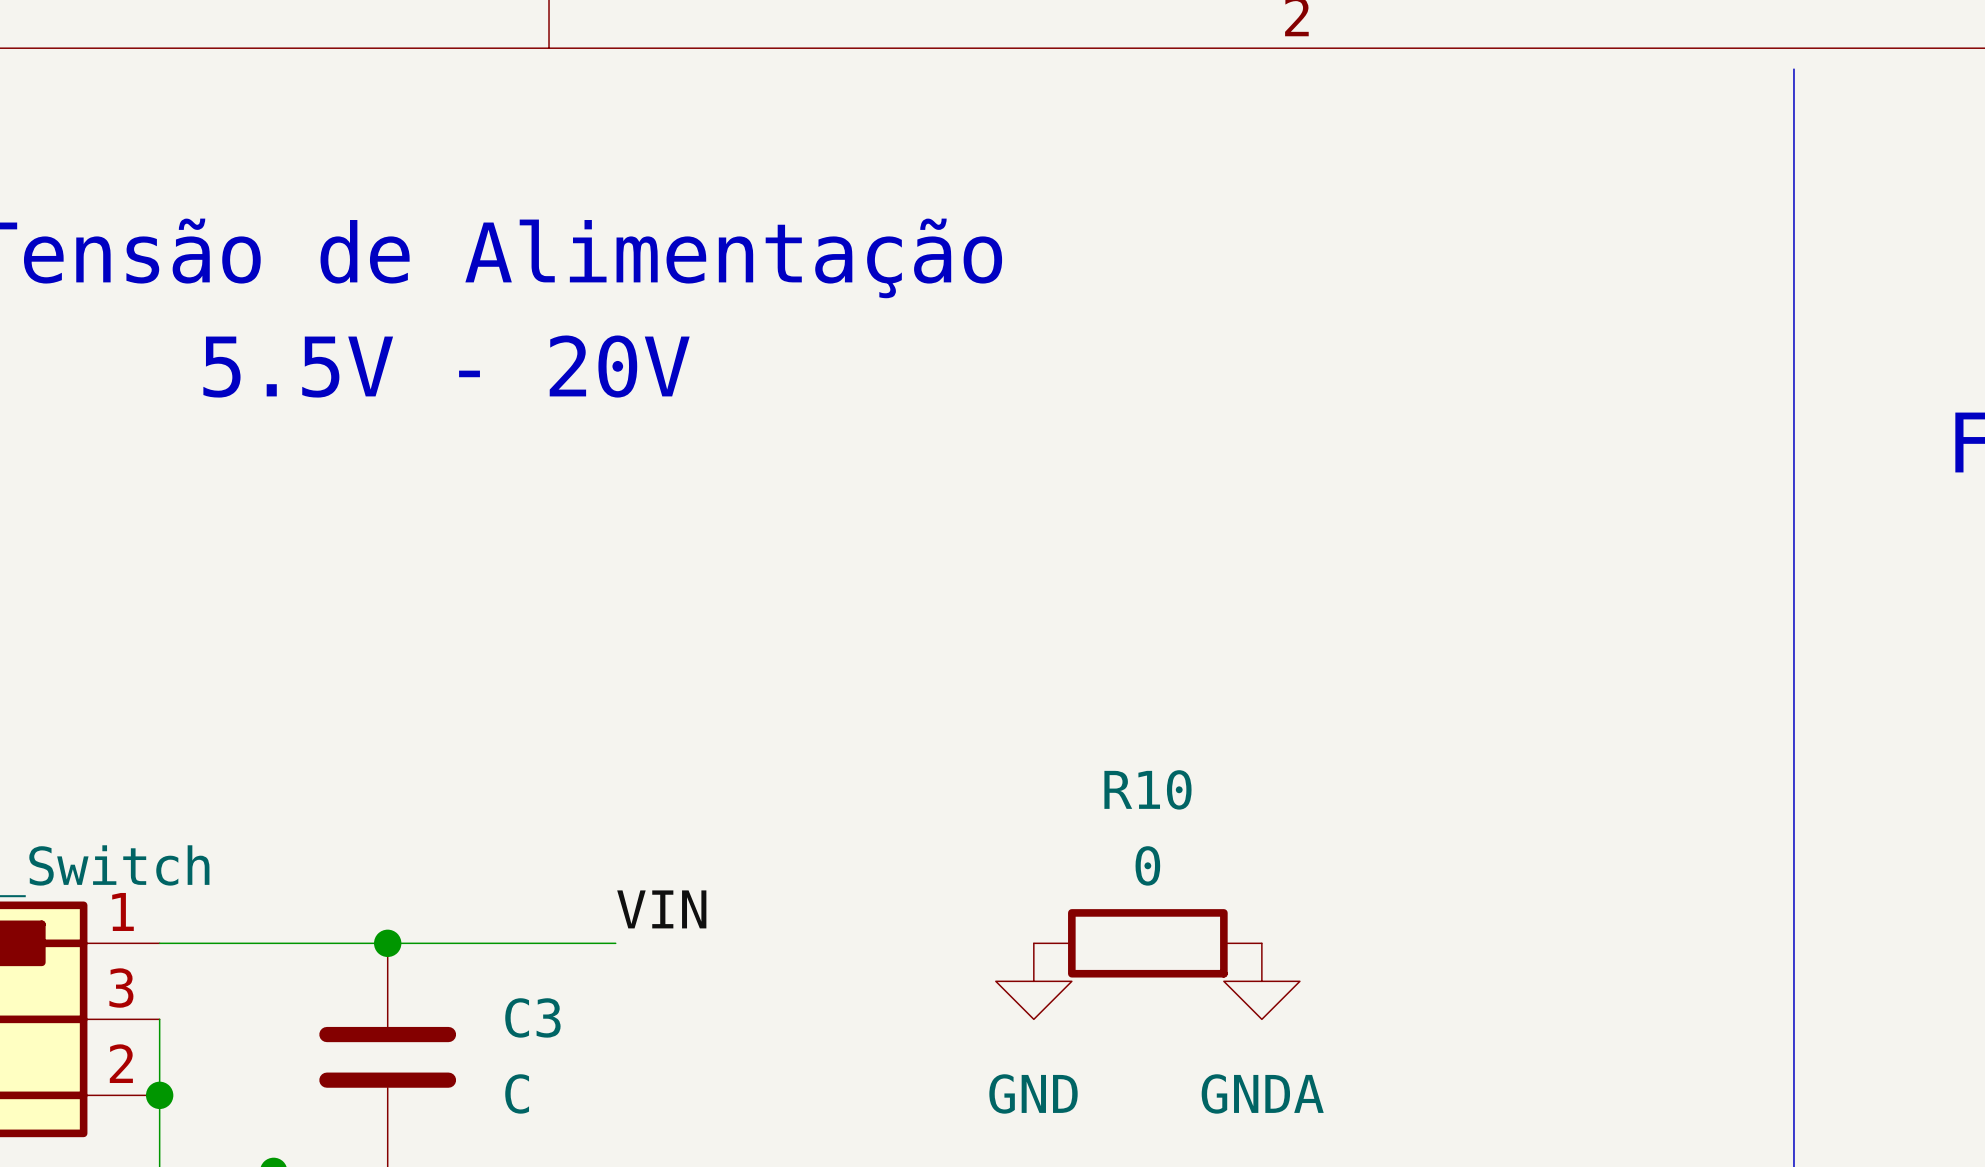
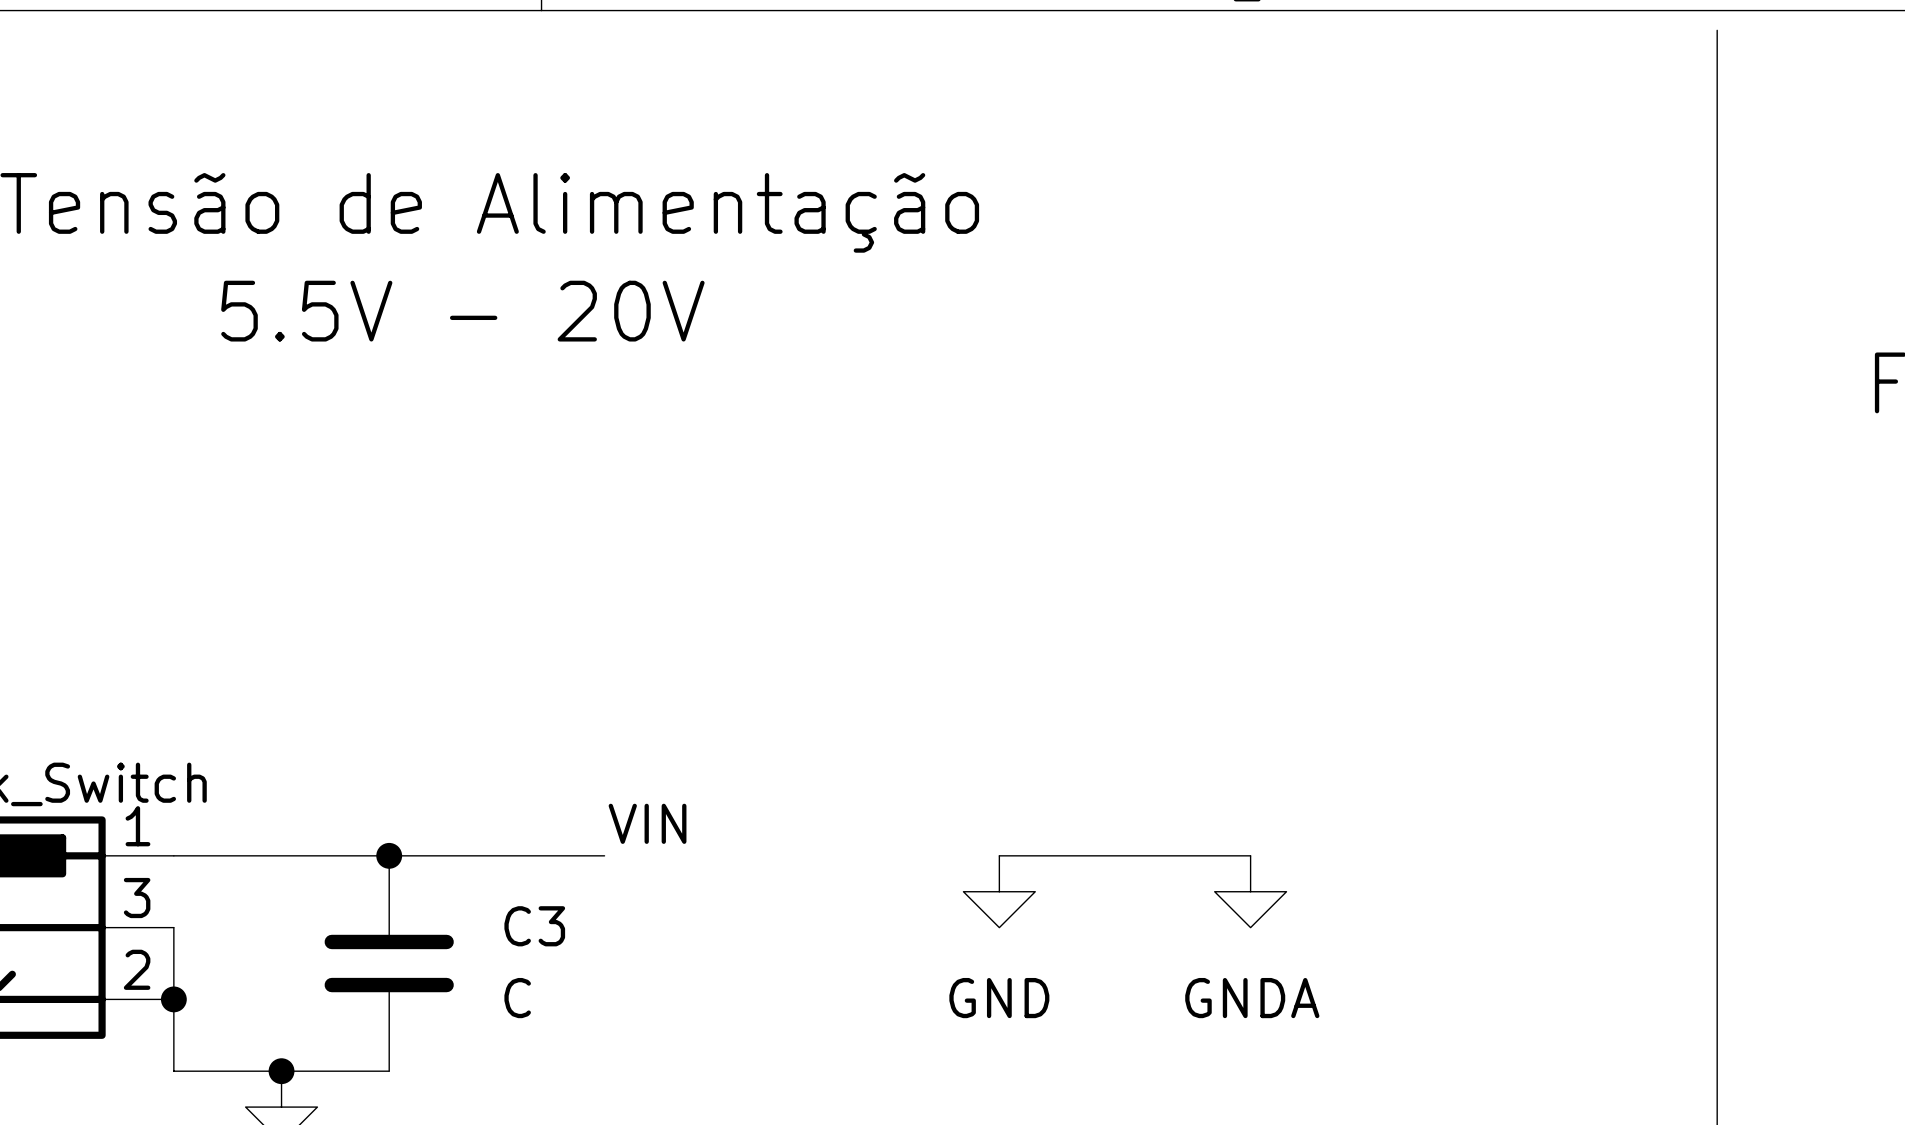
wire: none -> (999, 855) (1250, 855)
R10: 0 (1147, 943) -> none
power symbol position: GNDA (1261, 981) -> GNDA (1250, 891)

